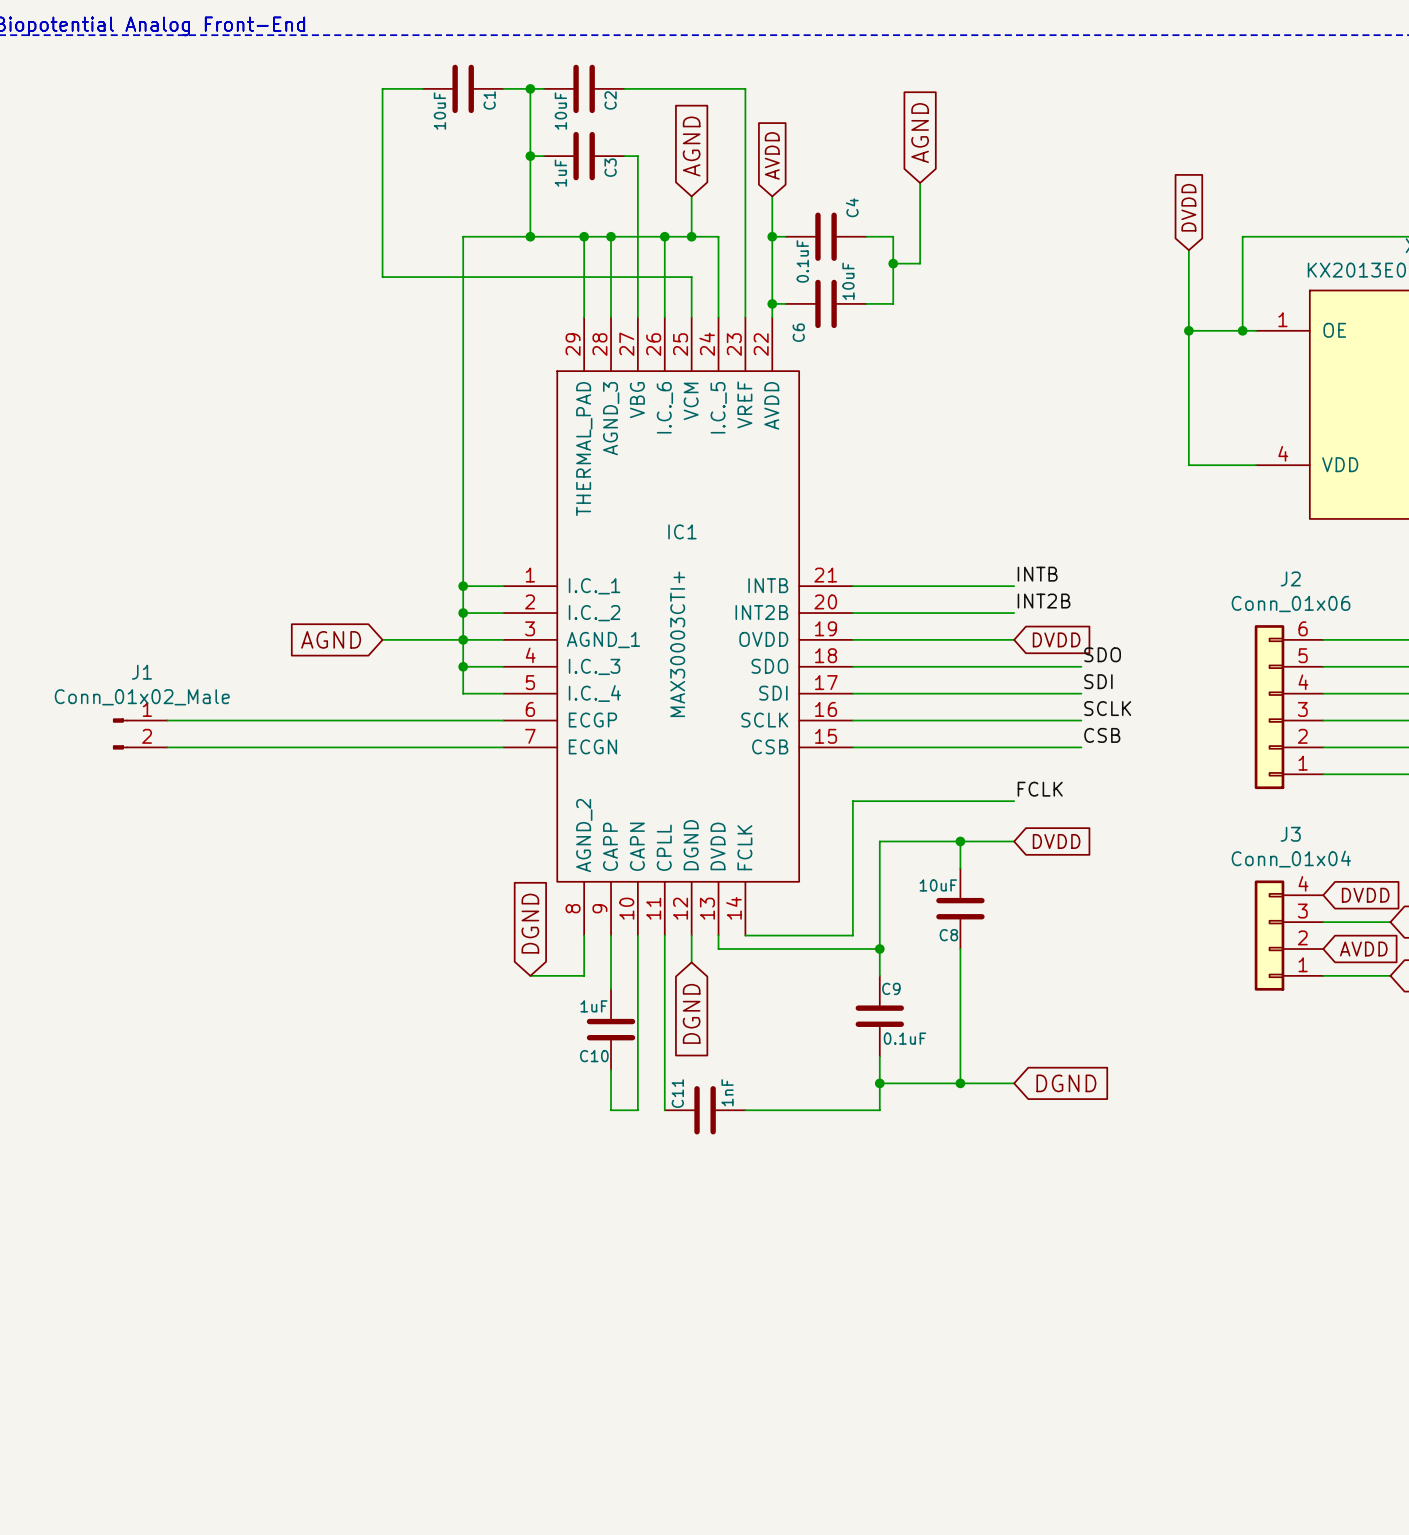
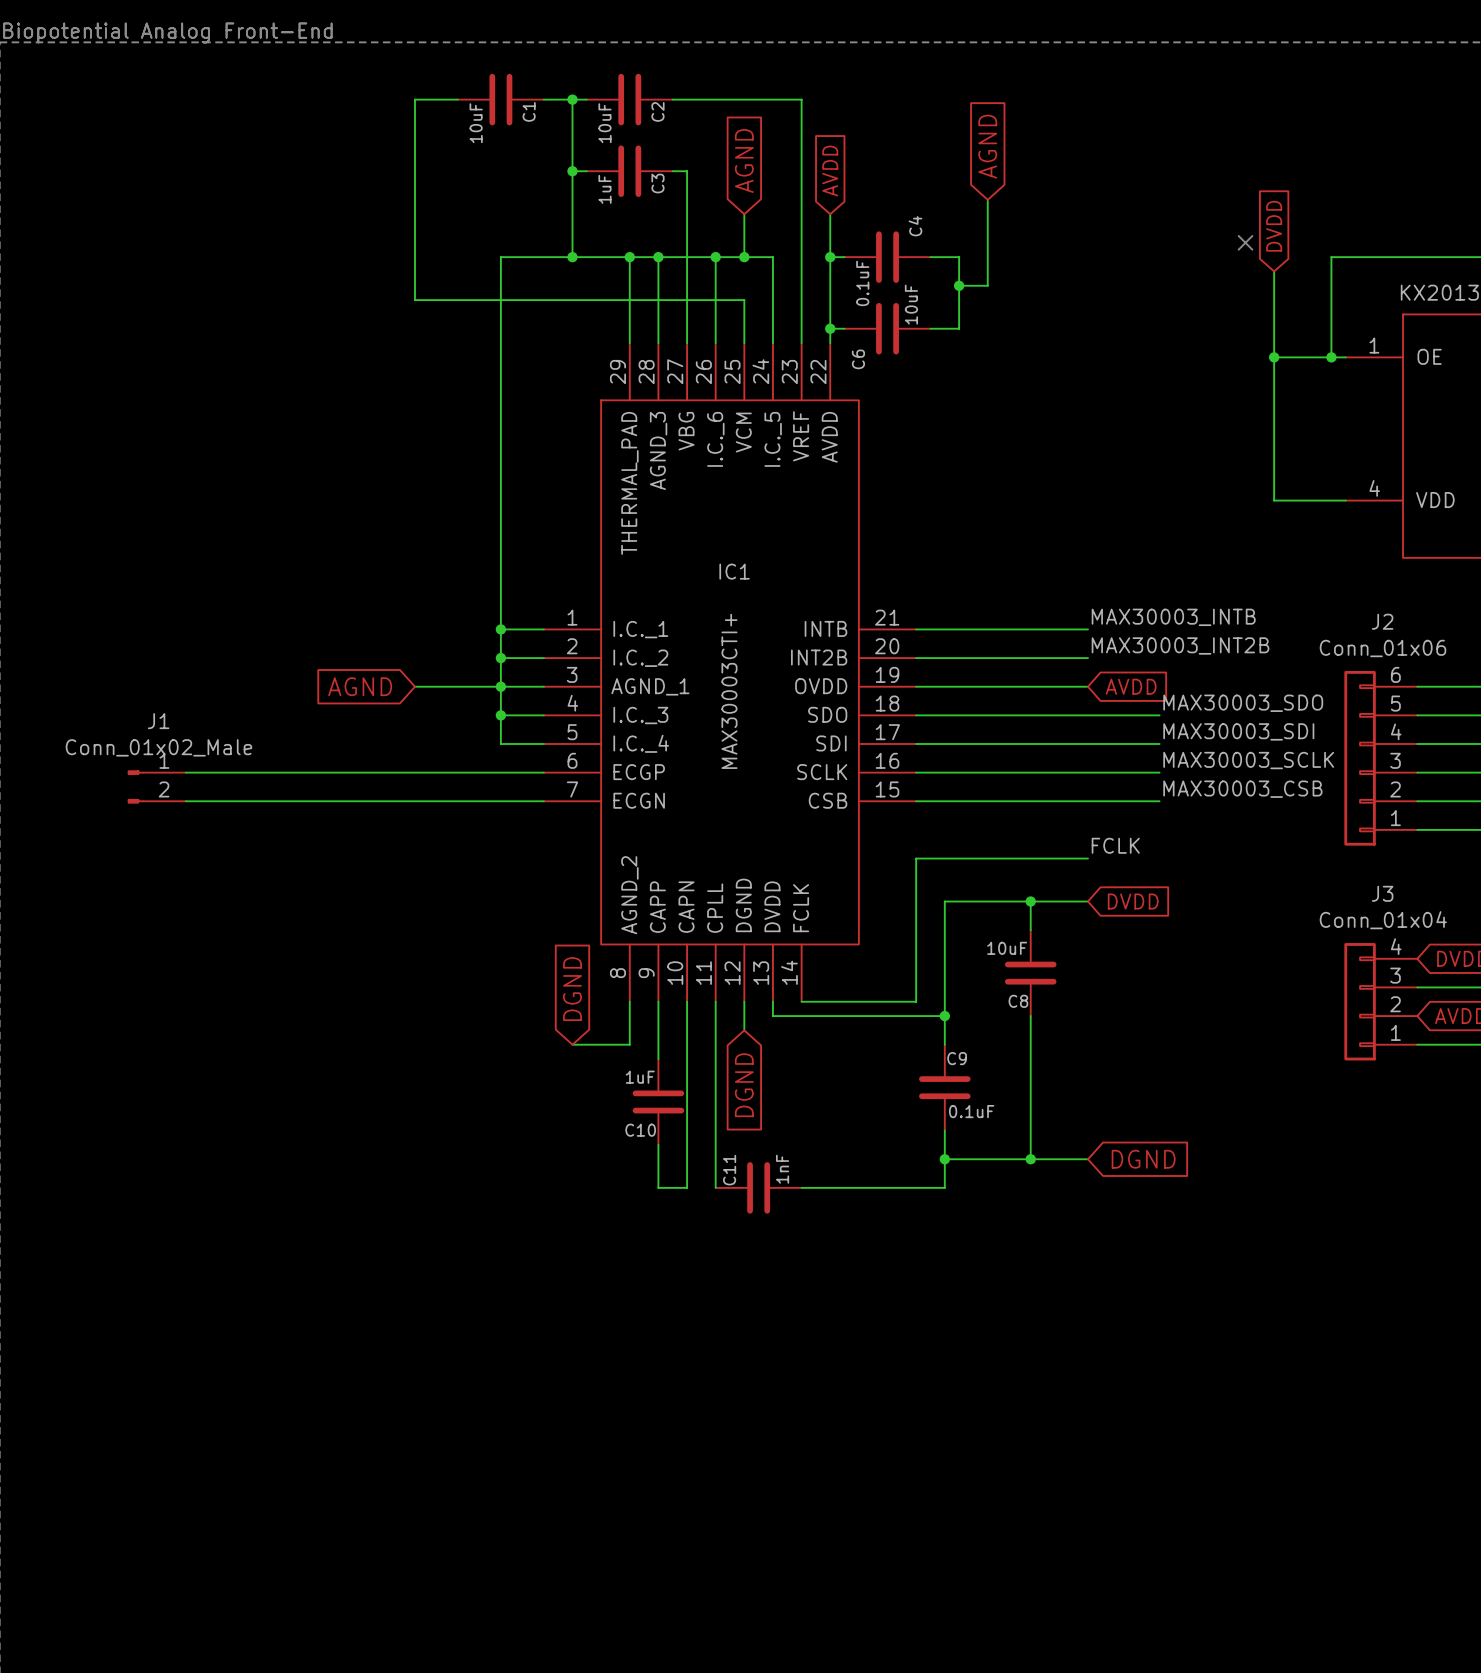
no-connect mark: none -> (1245, 242)
label: INTB (1037, 574) -> MAX30003_INTB (1173, 617)
label: INT2B (1044, 601) -> MAX30003_INT2B (1180, 645)
global label: DVDD (1056, 639) -> AVDD (1131, 686)
label: SDO (1102, 654) -> MAX30003_SDO (1243, 703)
label: SDI (1098, 681) -> MAX30003_SDI (1238, 731)
label: SCLK (1107, 708) -> MAX30003_SCLK (1248, 760)
label: CSB (1102, 735) -> MAX30003_CSB (1242, 789)

